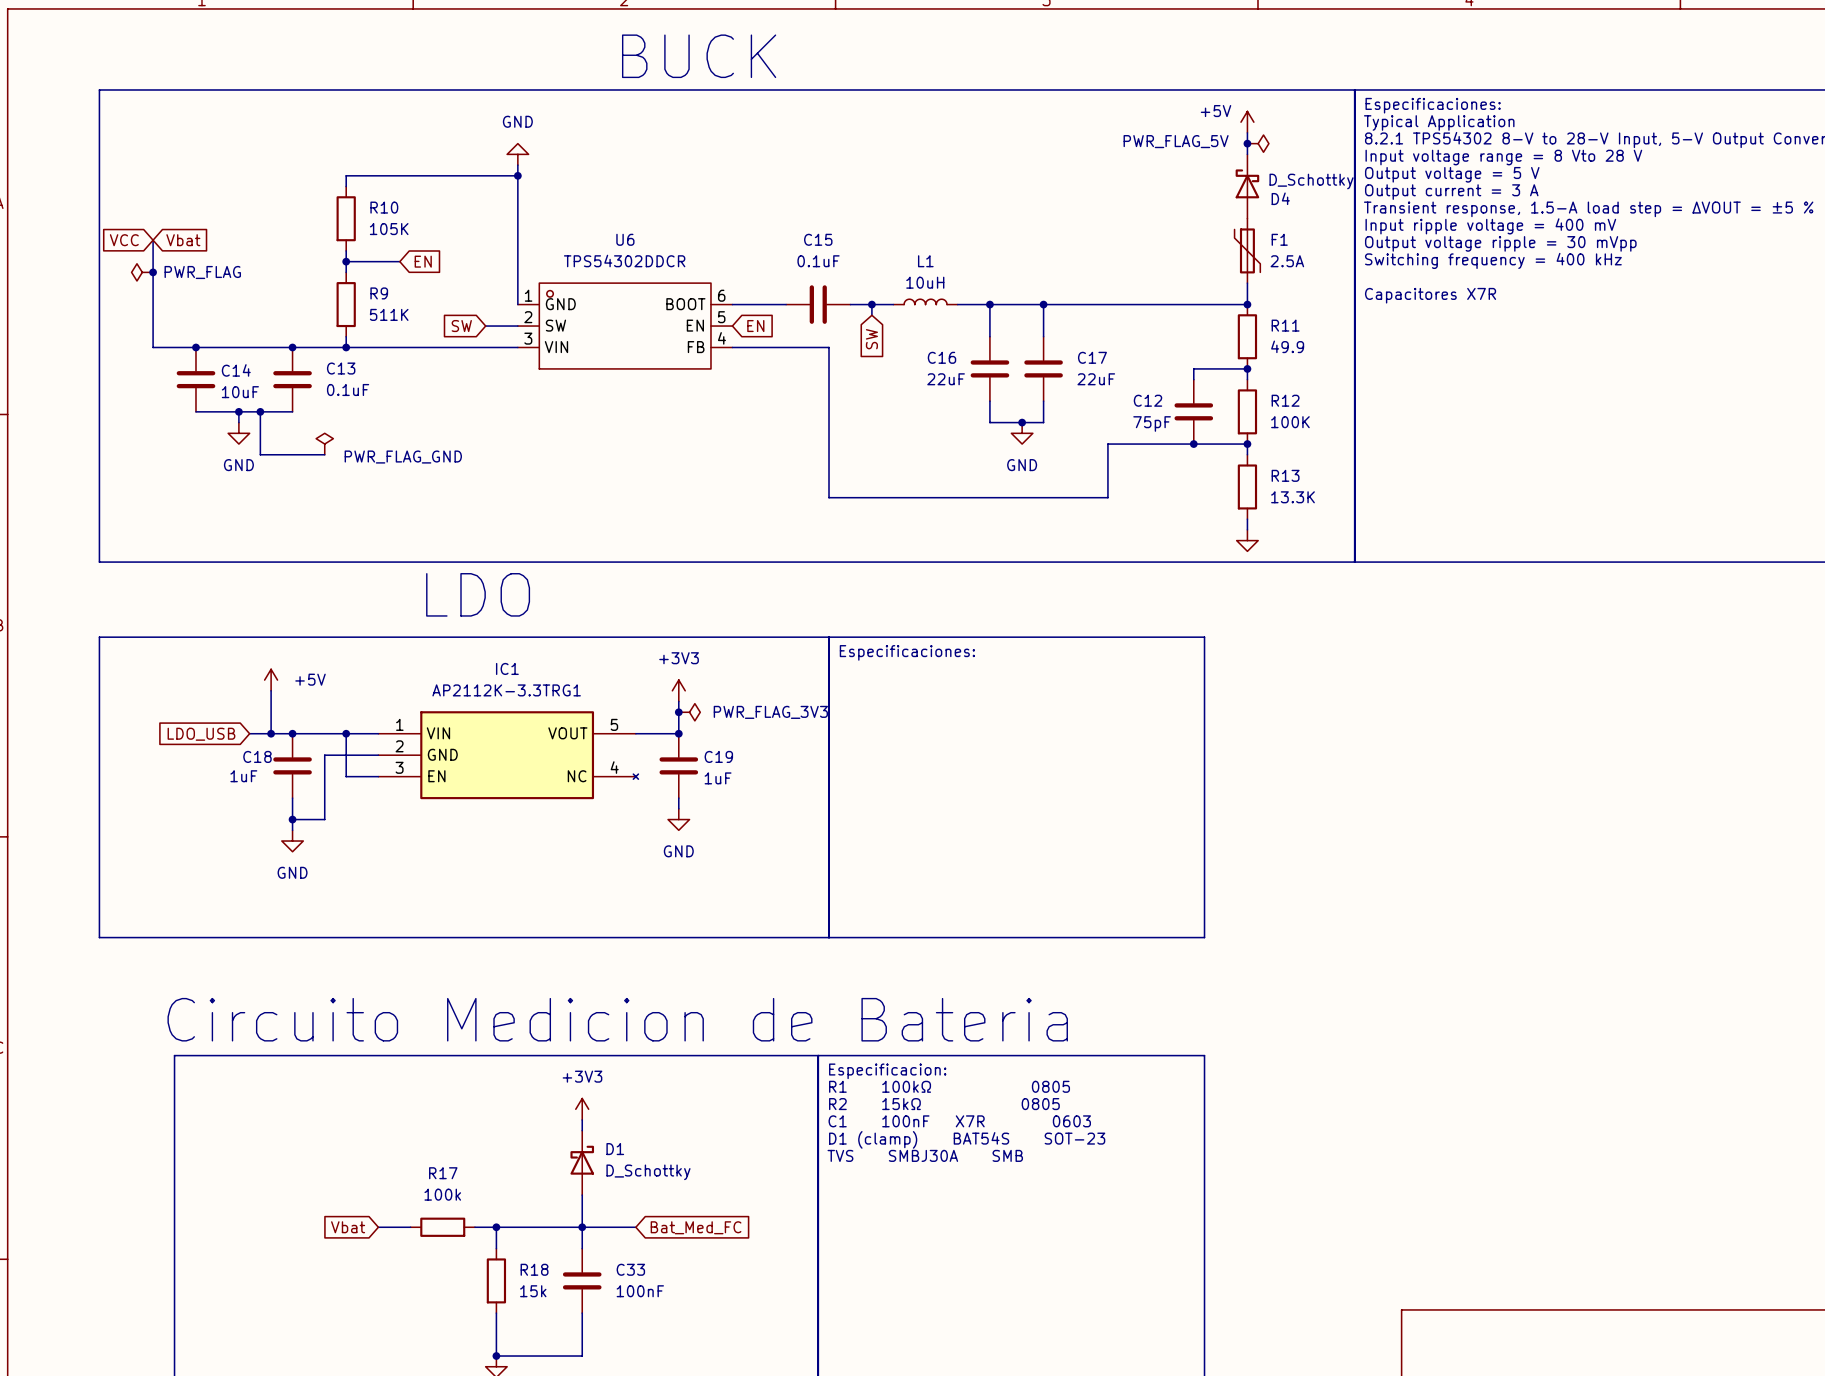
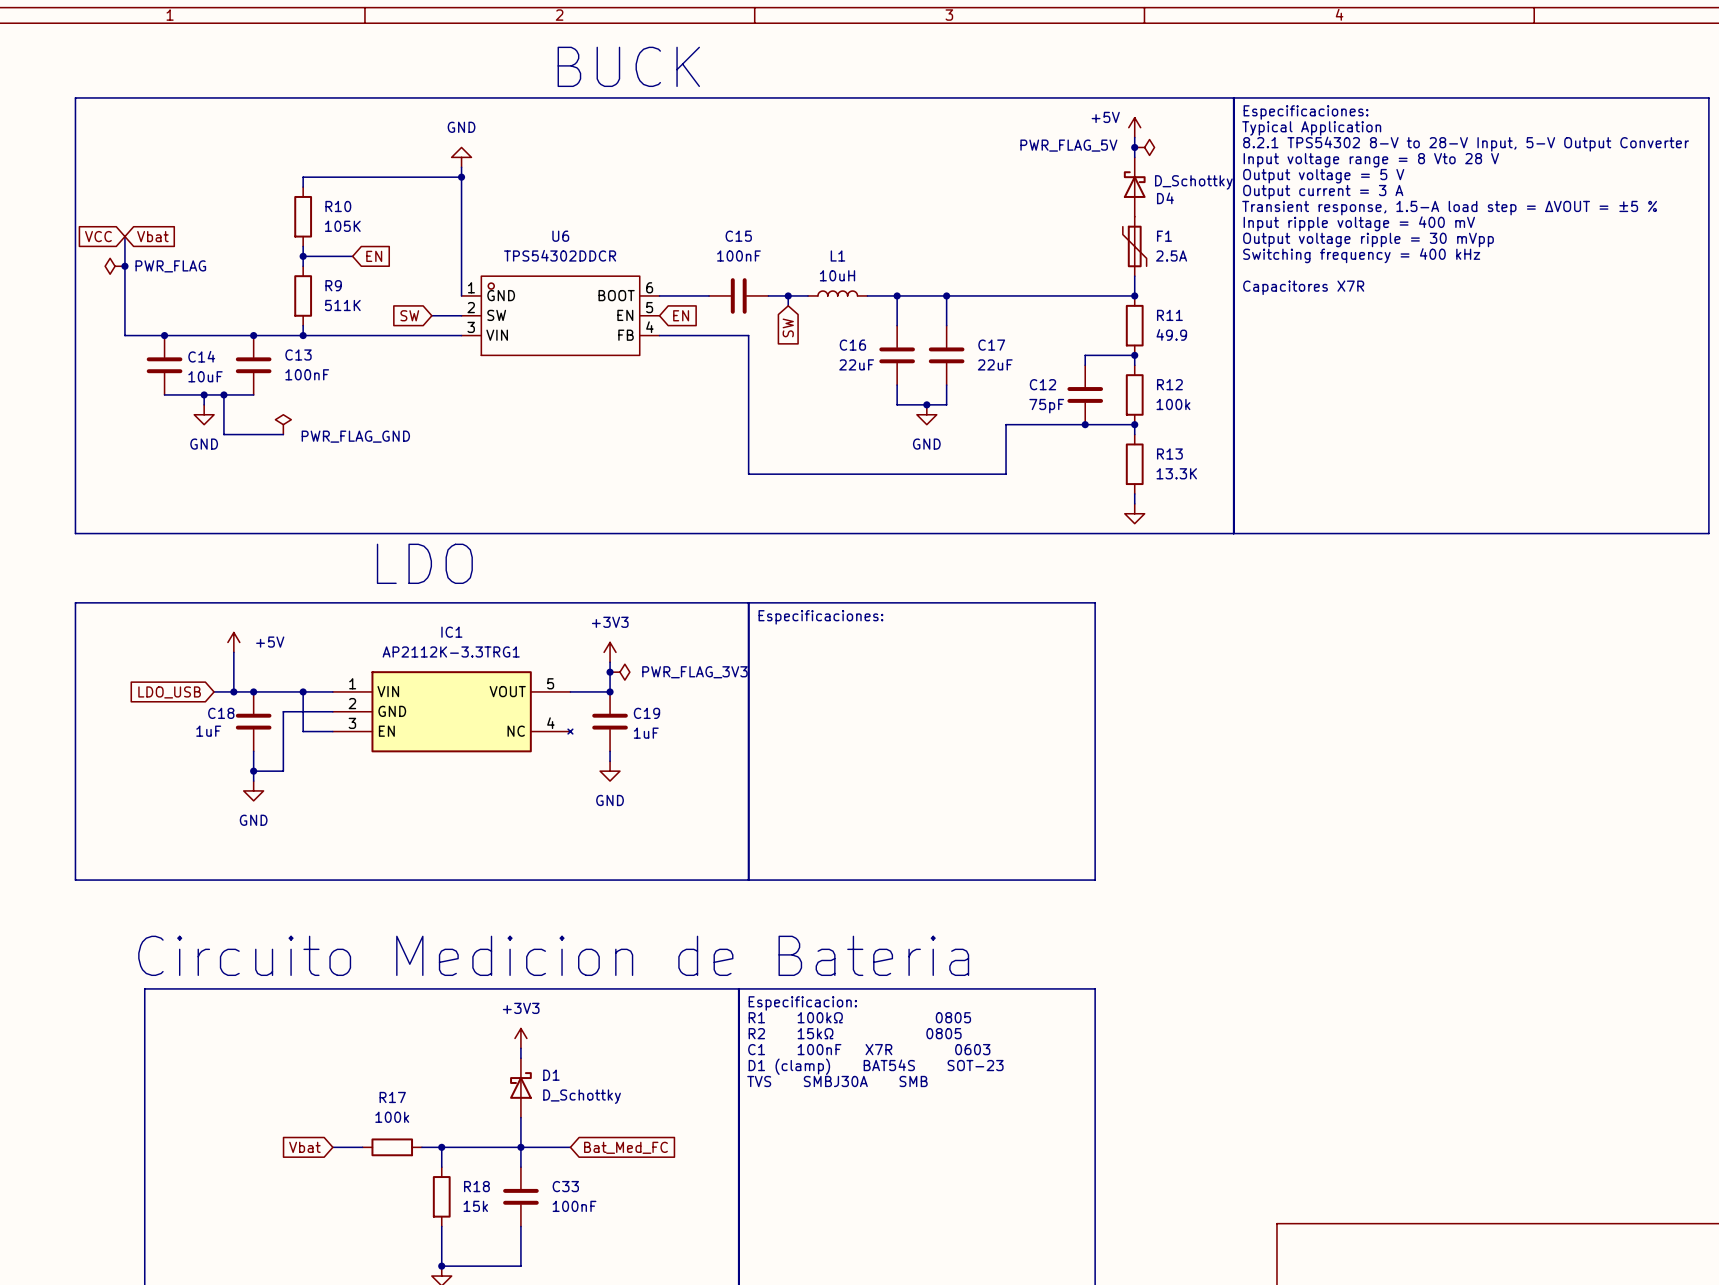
C15 value: 0.1uF (818, 261) -> 100nF (738, 256)
C13 value: 0.1uF (348, 390) -> 100nF (307, 374)
R12 value: 100K (1290, 422) -> 100k (1173, 404)

